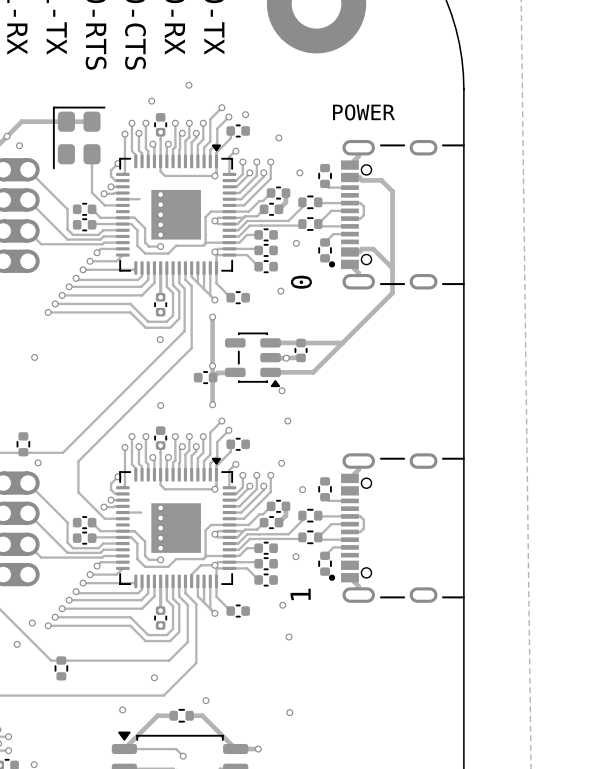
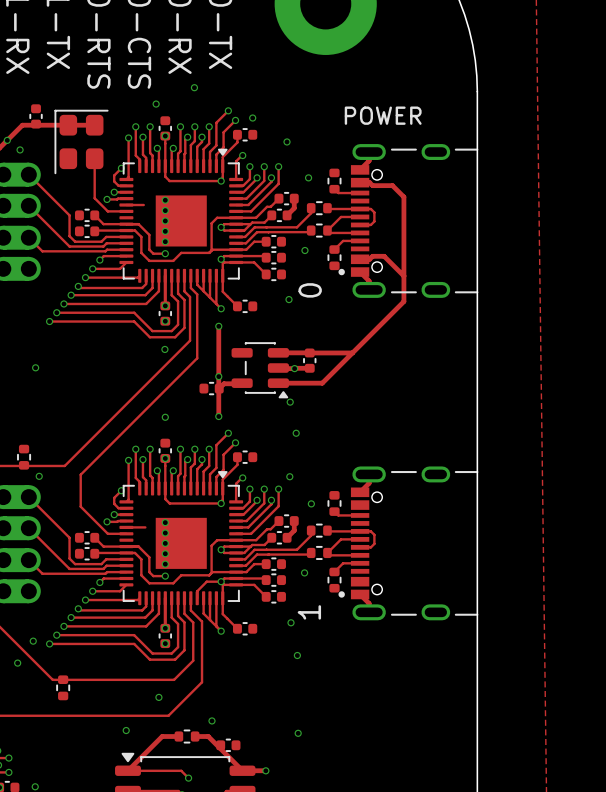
part: none -> (36, 116)
part: none -> (228, 745)

